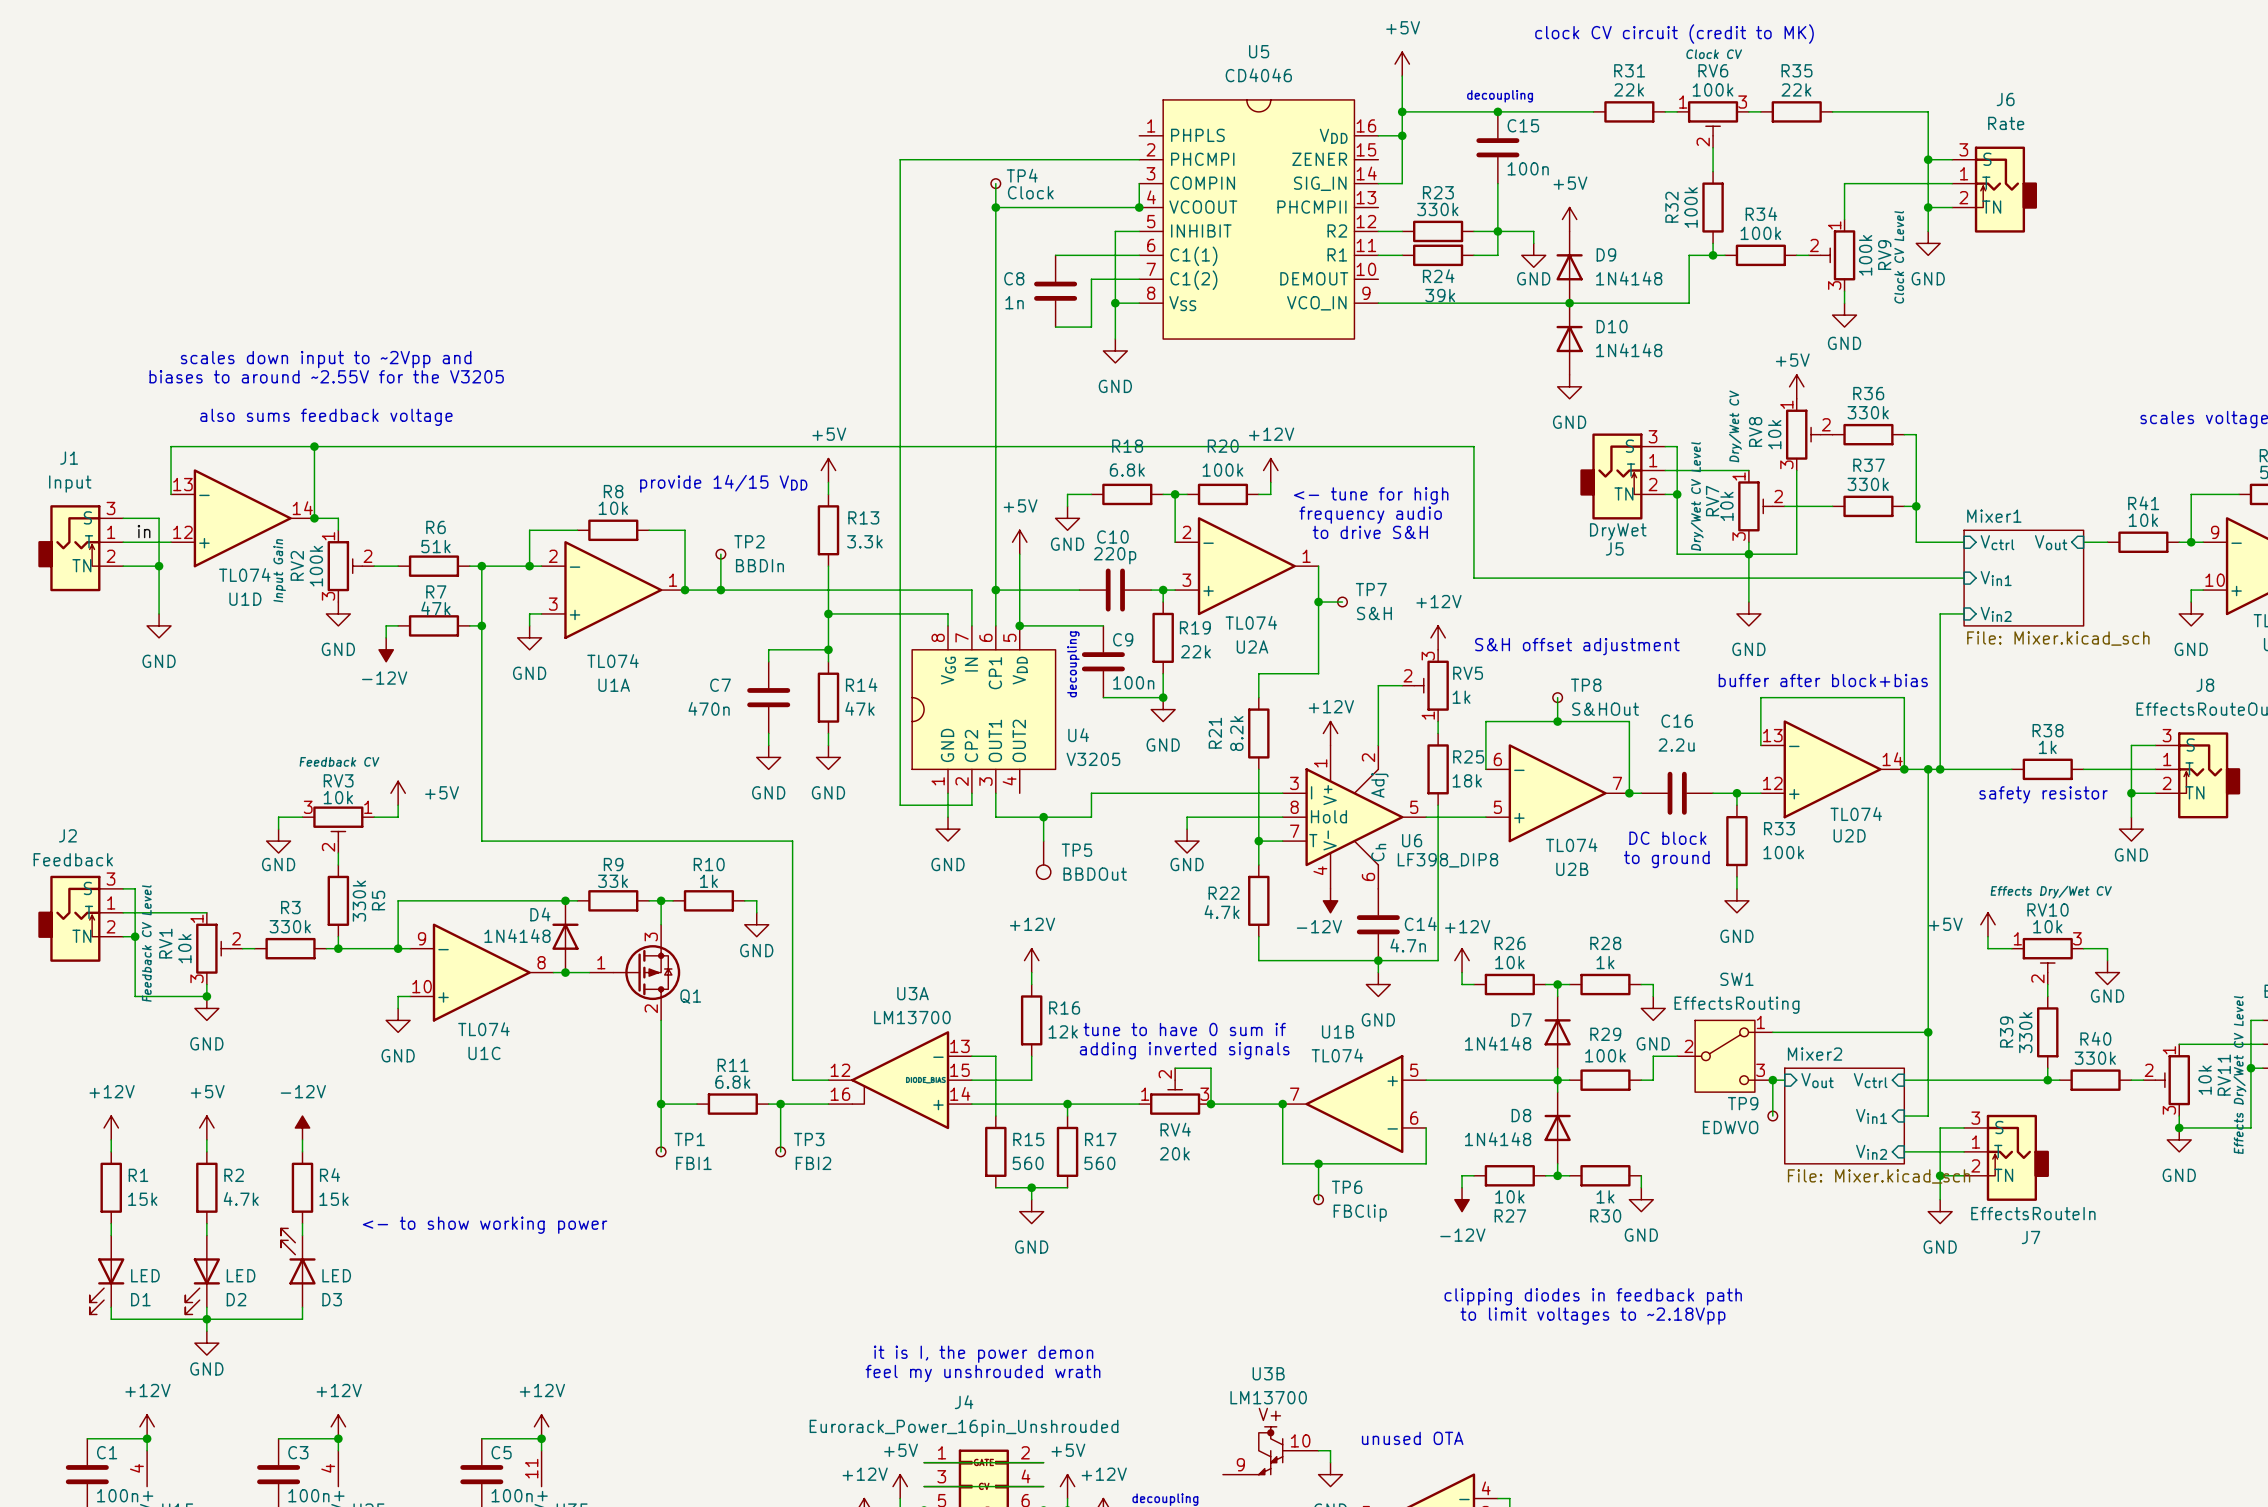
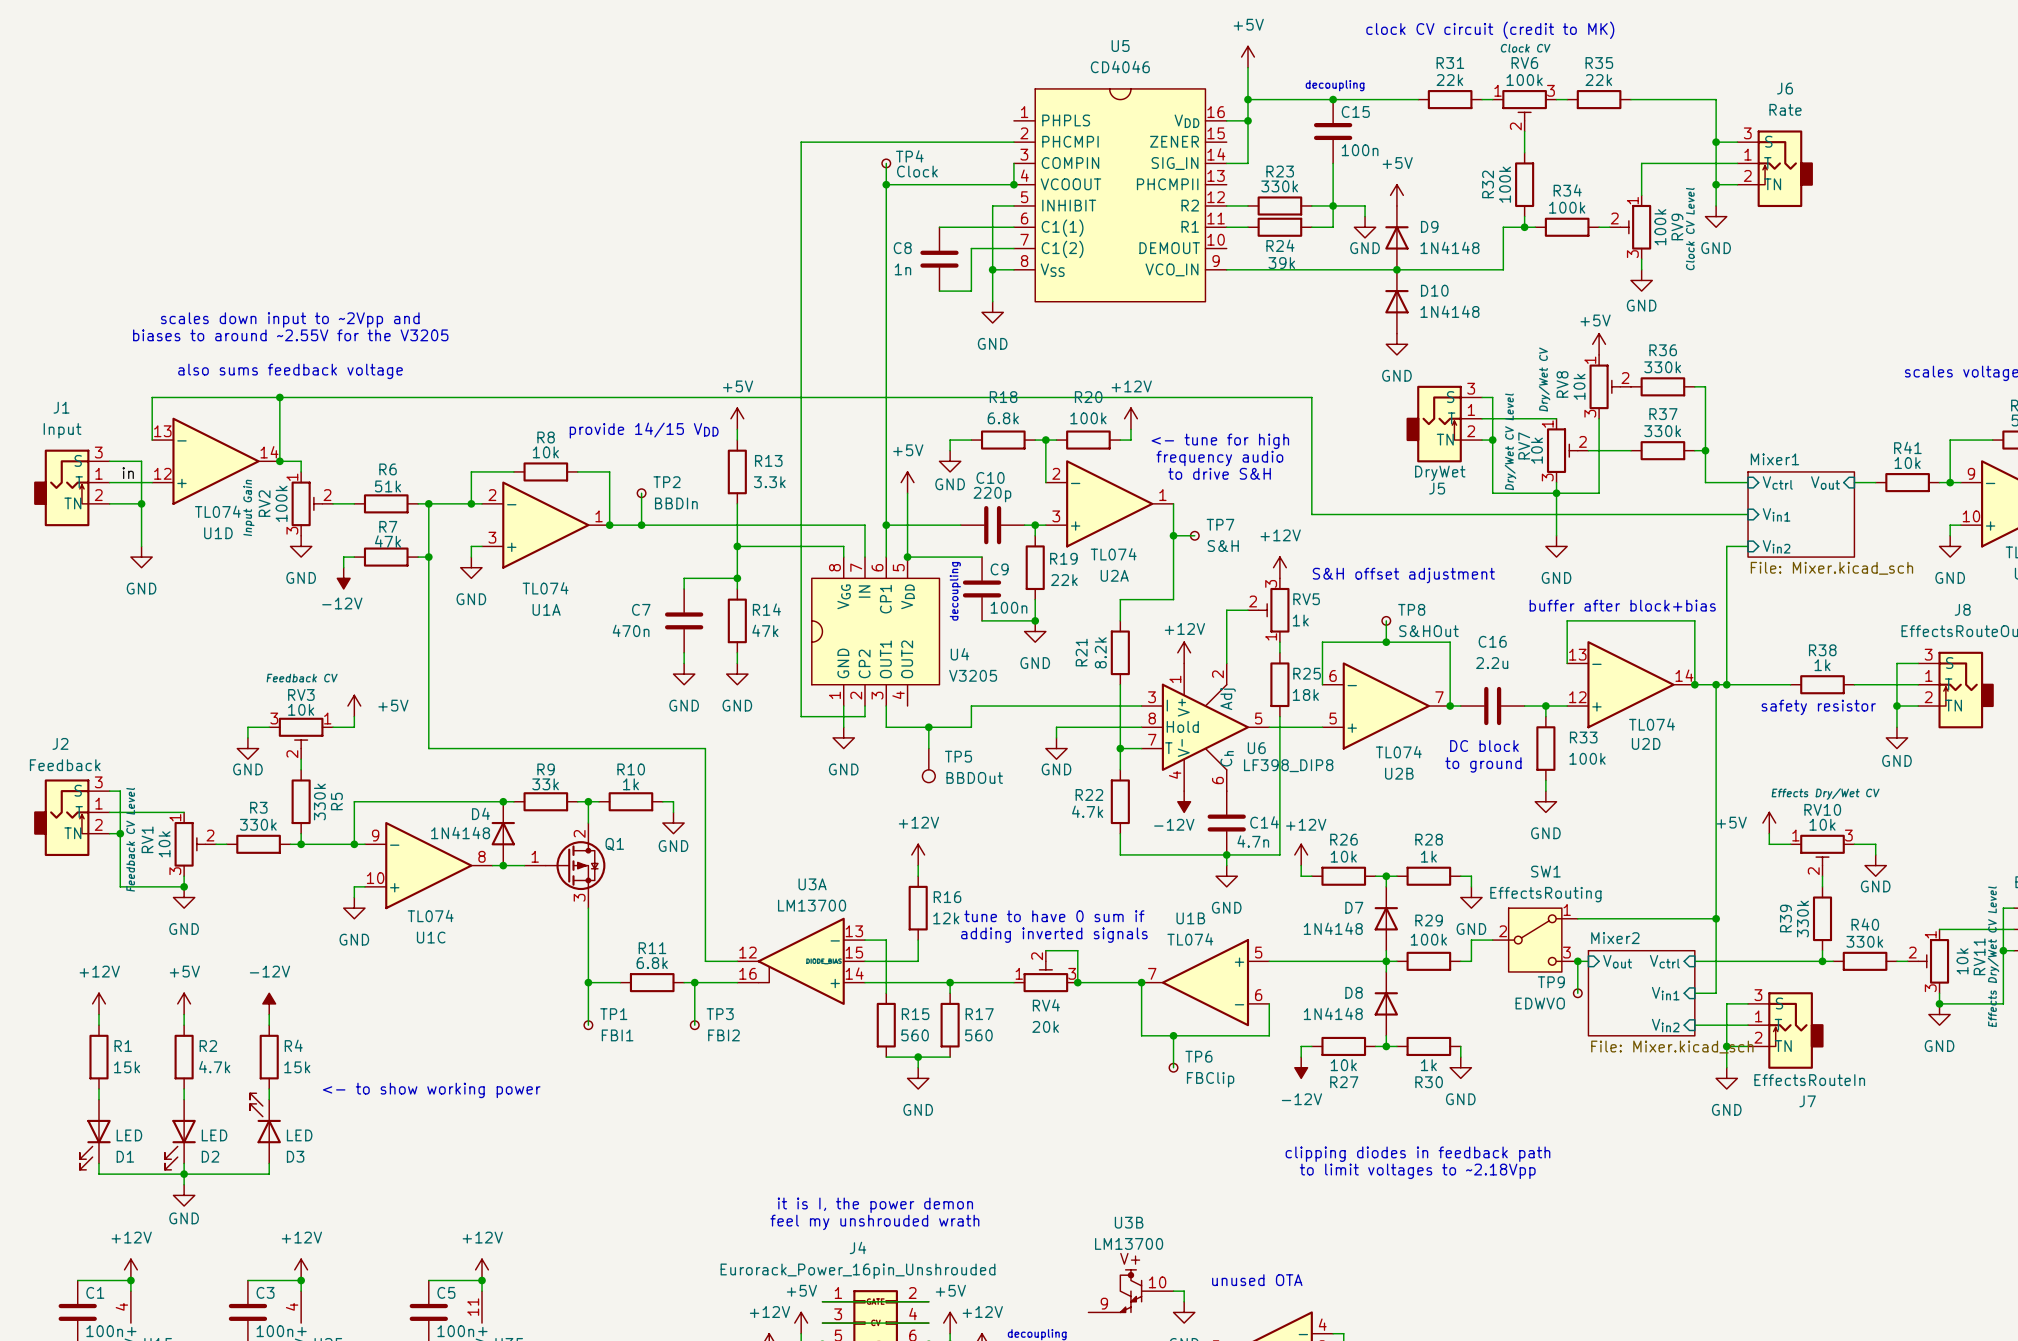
Q1 flip: as is (646, 972) -> up-down (575, 865)

